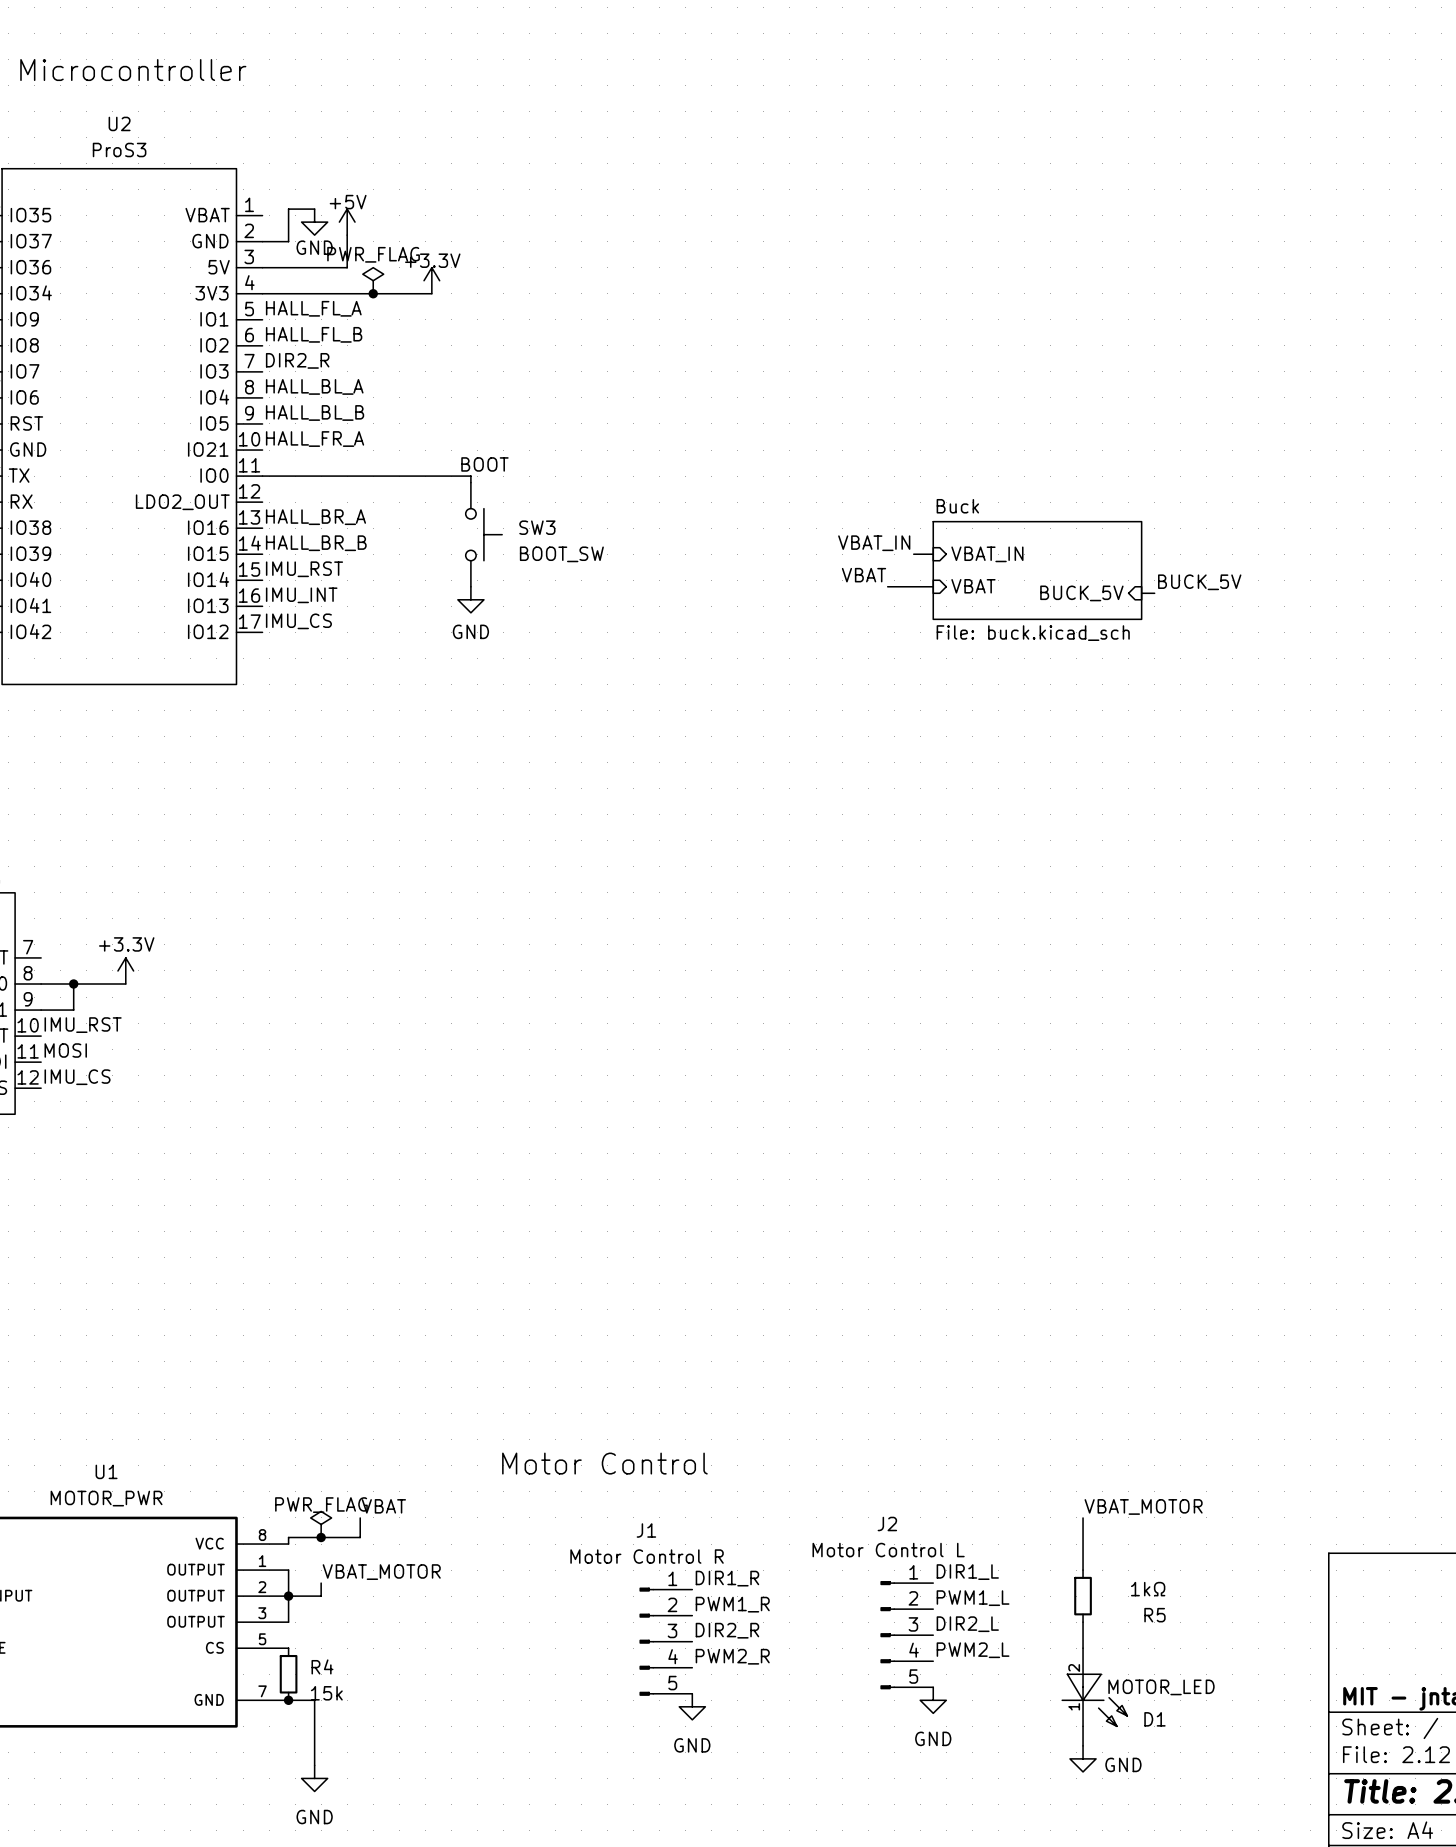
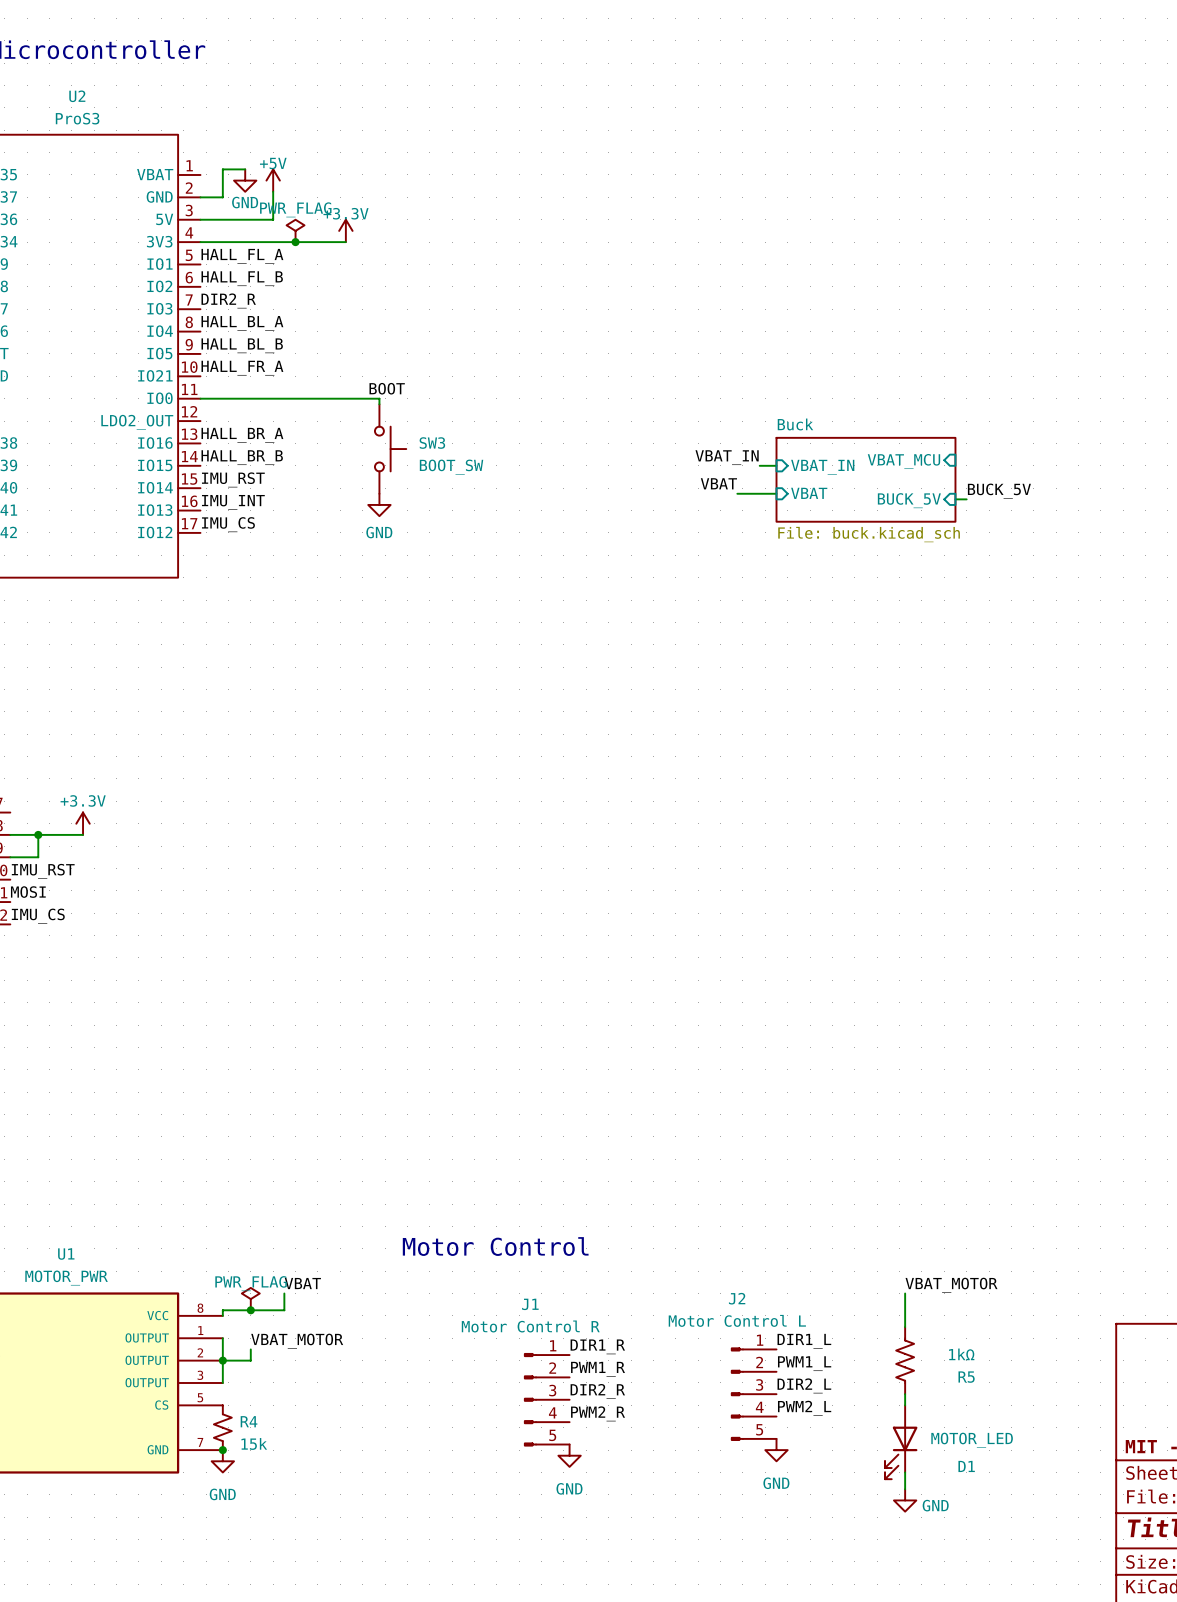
sheet pin: none -> VBAT_MCU (903, 461)
R5 symbol: [1074, 1570, 1092, 1623] -> [896, 1327, 915, 1395]
R4 symbol: [279, 1648, 298, 1701] -> [213, 1405, 232, 1451]
D1 symbol: [1062, 1648, 1128, 1727] -> [885, 1405, 918, 1480]
wire: (288, 1700) (314, 1700) (314, 1765) -> none
power symbol position: GND (314, 1778) -> GND (222, 1461)

